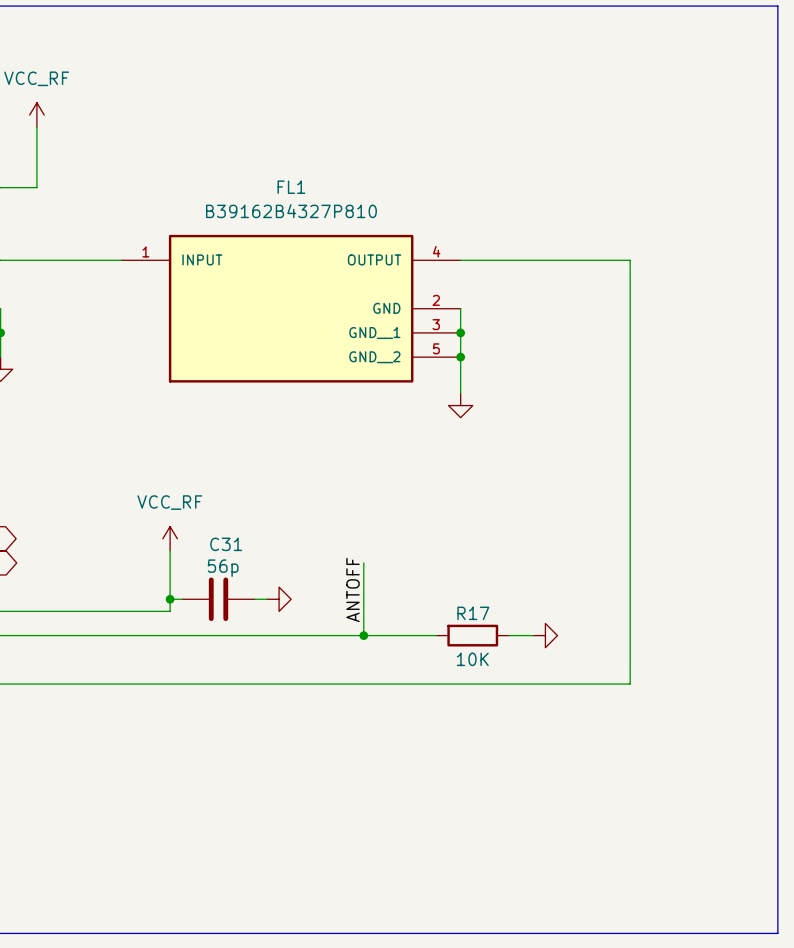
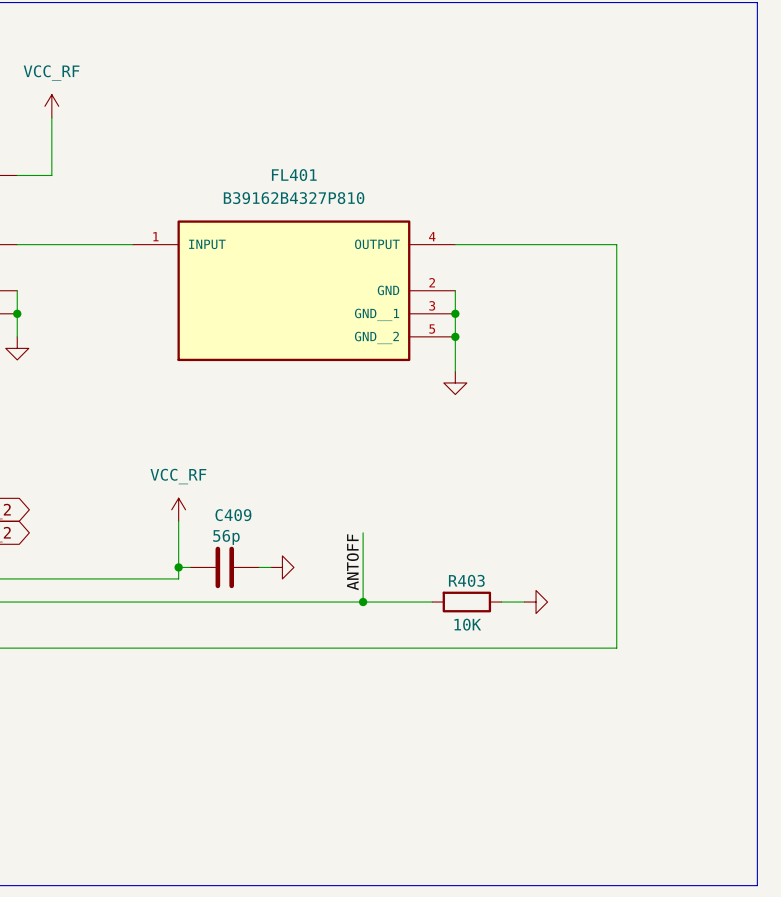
FL1 name: FL1 (291, 187) -> FL401 (294, 175)
C31 name: C31 (226, 544) -> C409 (233, 515)
R17 name: R17 (473, 613) -> R403 (466, 580)

